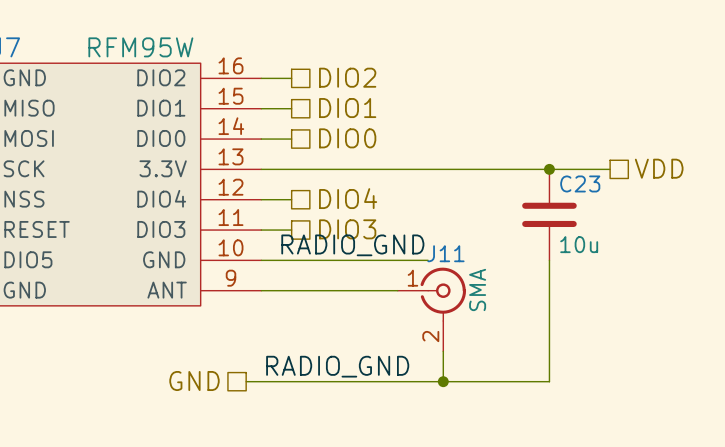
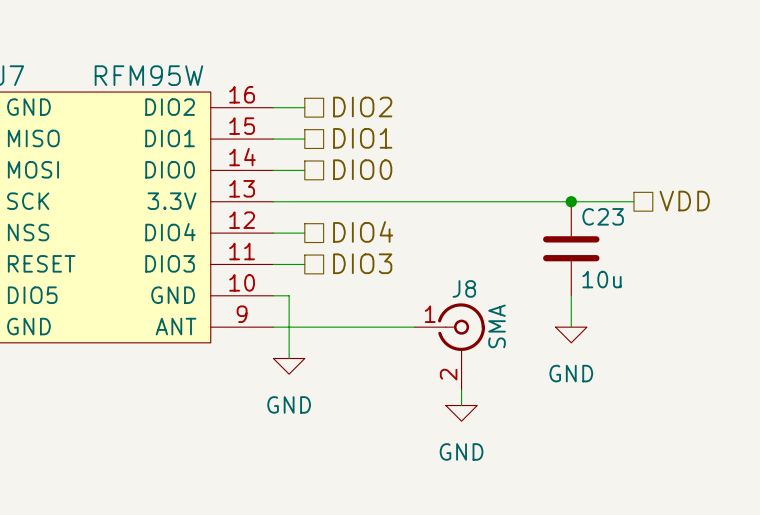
label: RADIO_GND (352, 245) -> none
J11 name: J11 (445, 253) -> J8 (464, 288)
wire: (276, 260) (428, 260) -> (289, 295) (289, 358)
wire: (549, 290) (549, 381) (246, 381) -> none
power symbol: none -> GND (571, 334)
power symbol: none -> GND (289, 366)
label: RADIO_GND (337, 366) -> none
wire: (443, 366) (443, 381) -> none
power symbol: none -> GND (461, 413)
hierarchical label: GND (194, 381) -> none
junction: (443, 381) -> none

